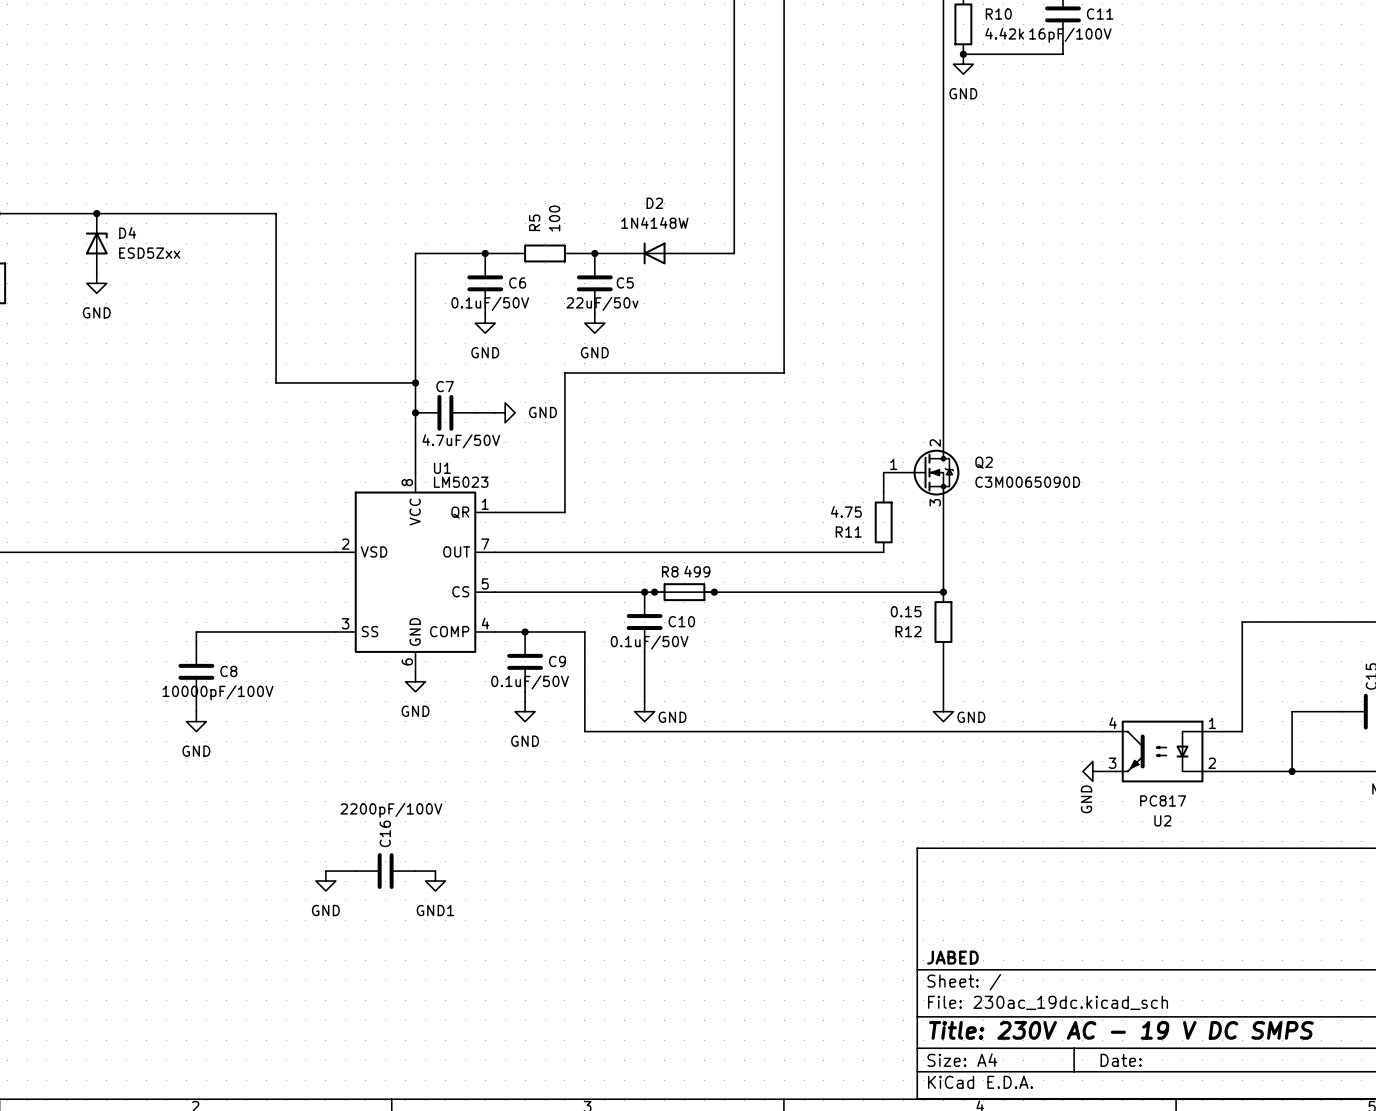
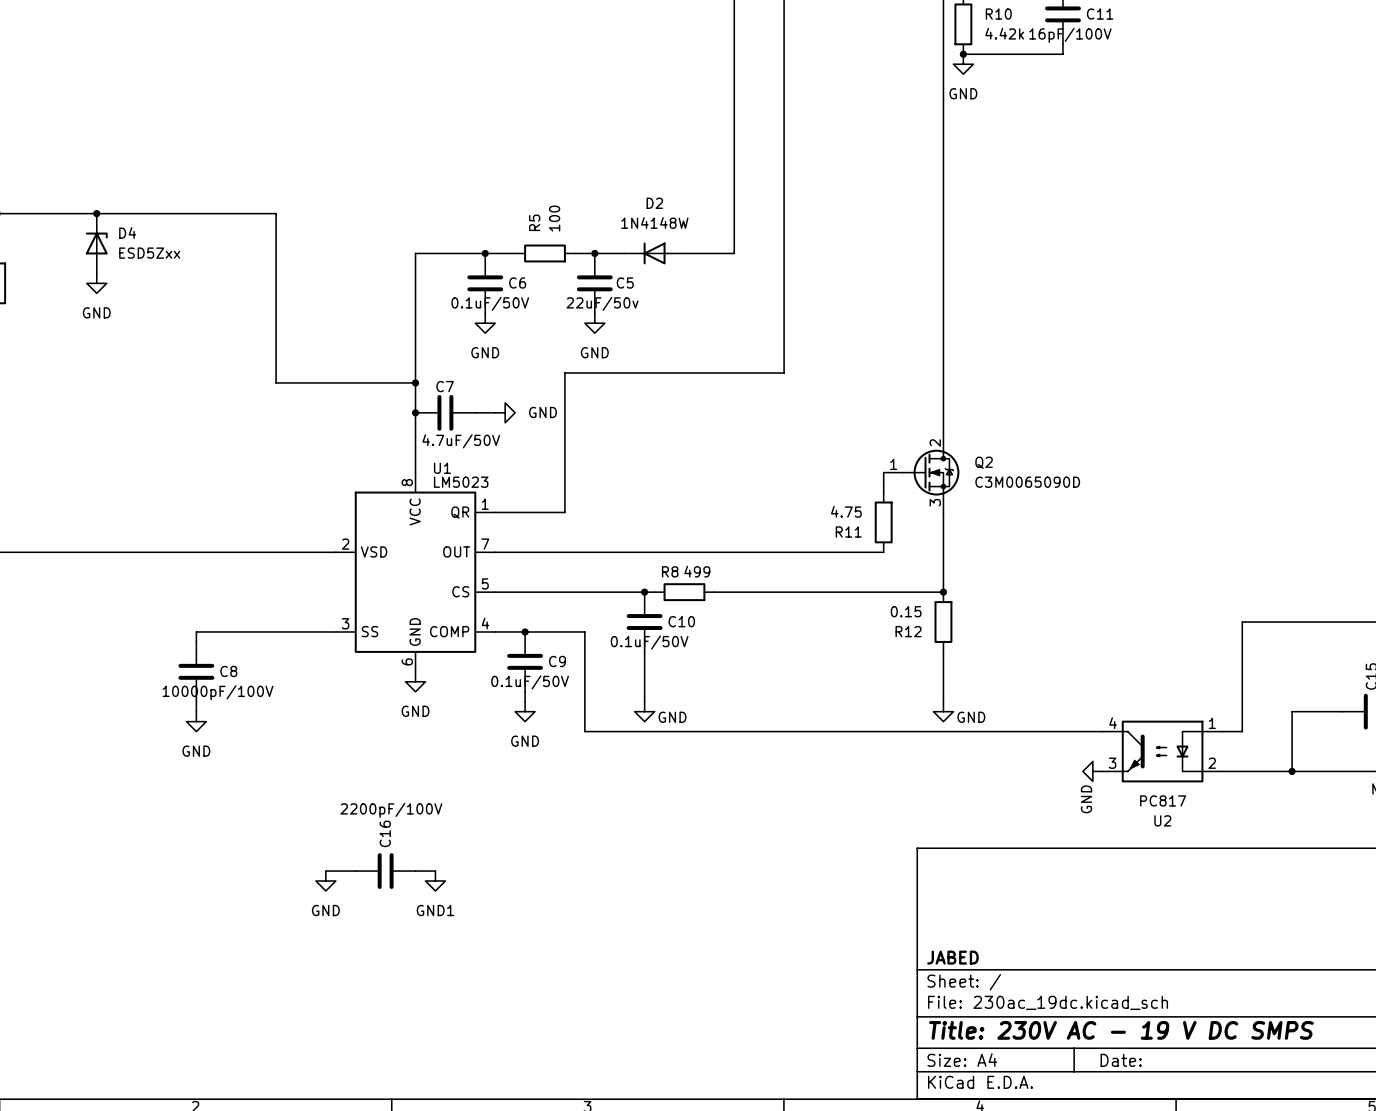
wire: (654, 592) (714, 592) -> none
junction: (654, 592) -> none
junction: (714, 592) -> none

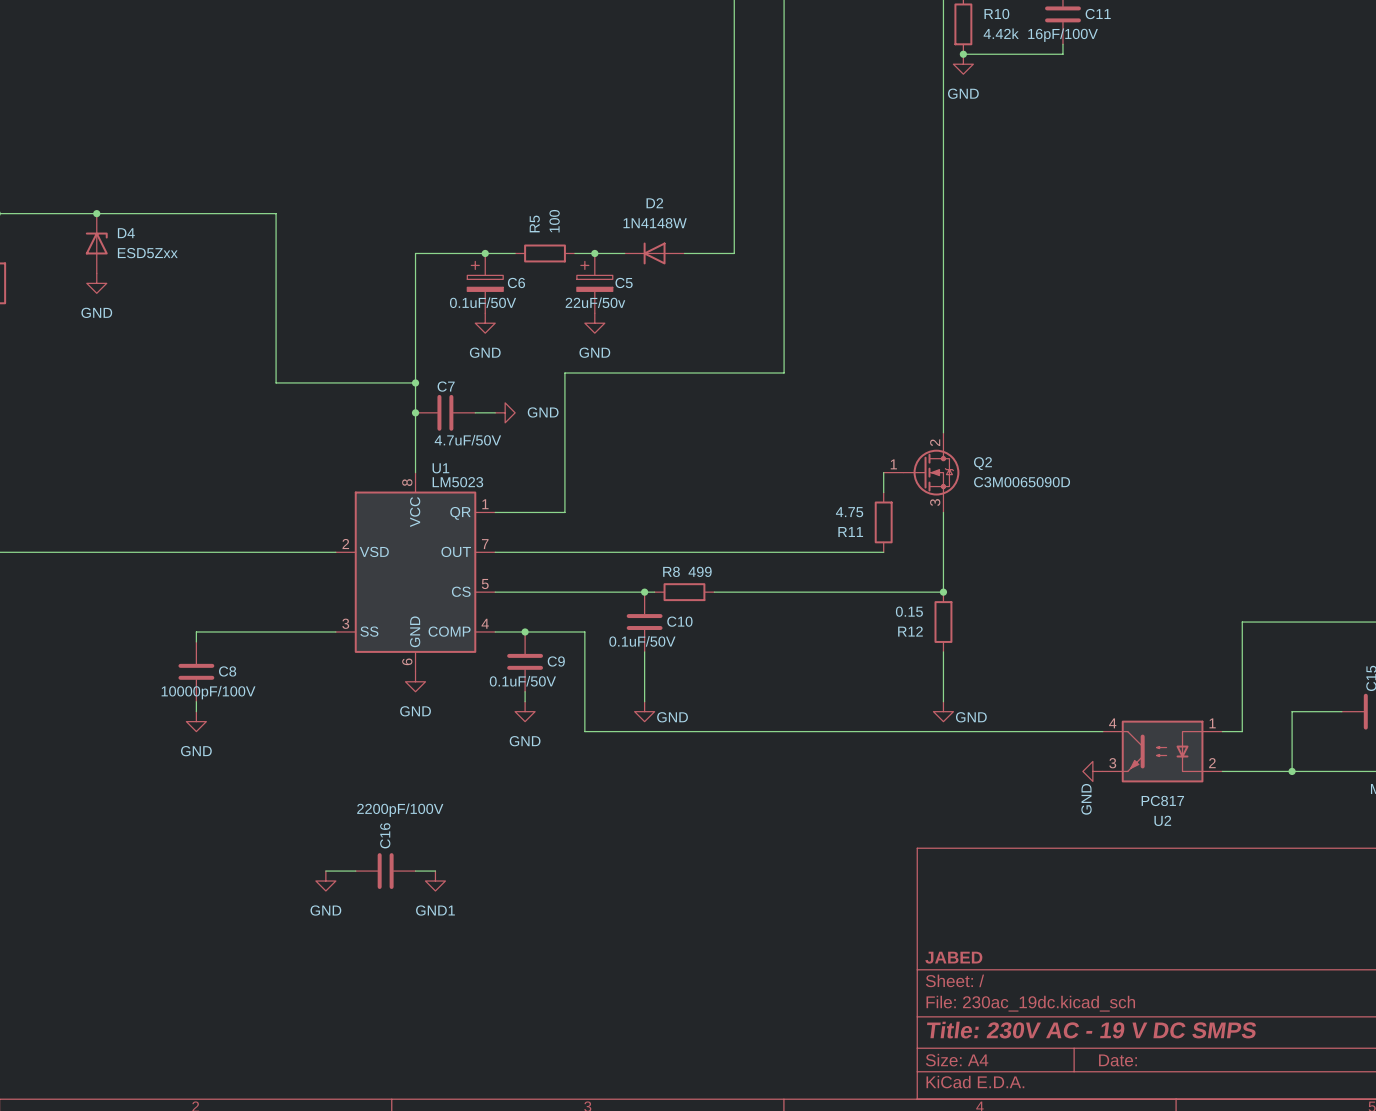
C6 symbol: [467, 253, 504, 314] -> [467, 253, 504, 314]
C5 symbol: [576, 253, 613, 314] -> [576, 253, 613, 314]

